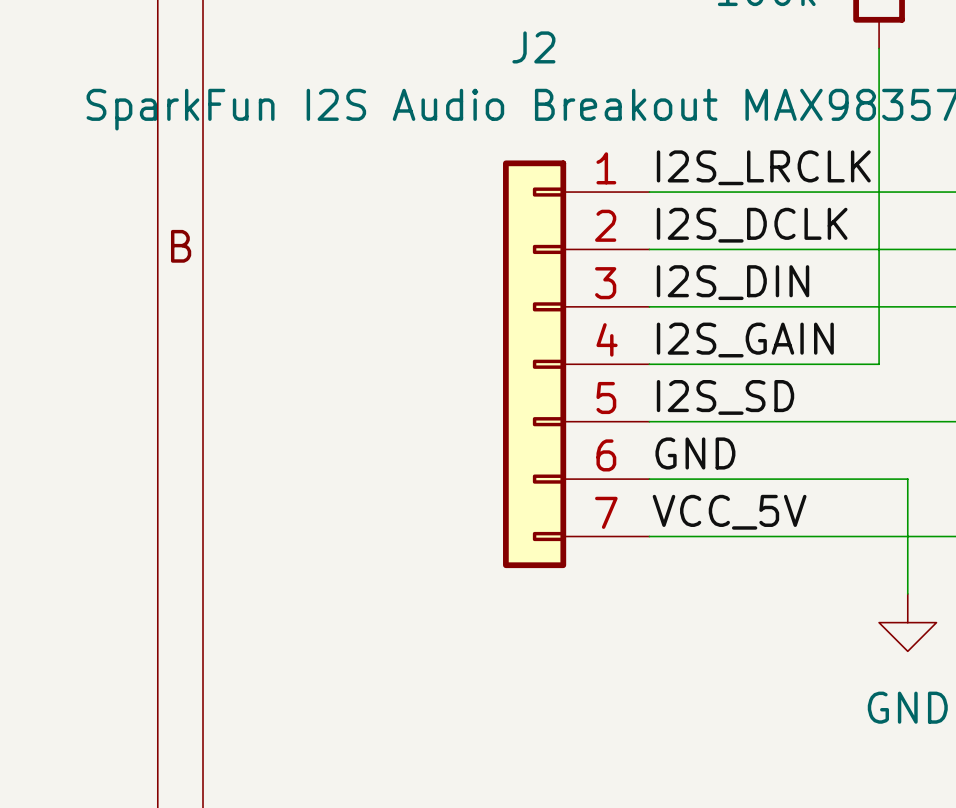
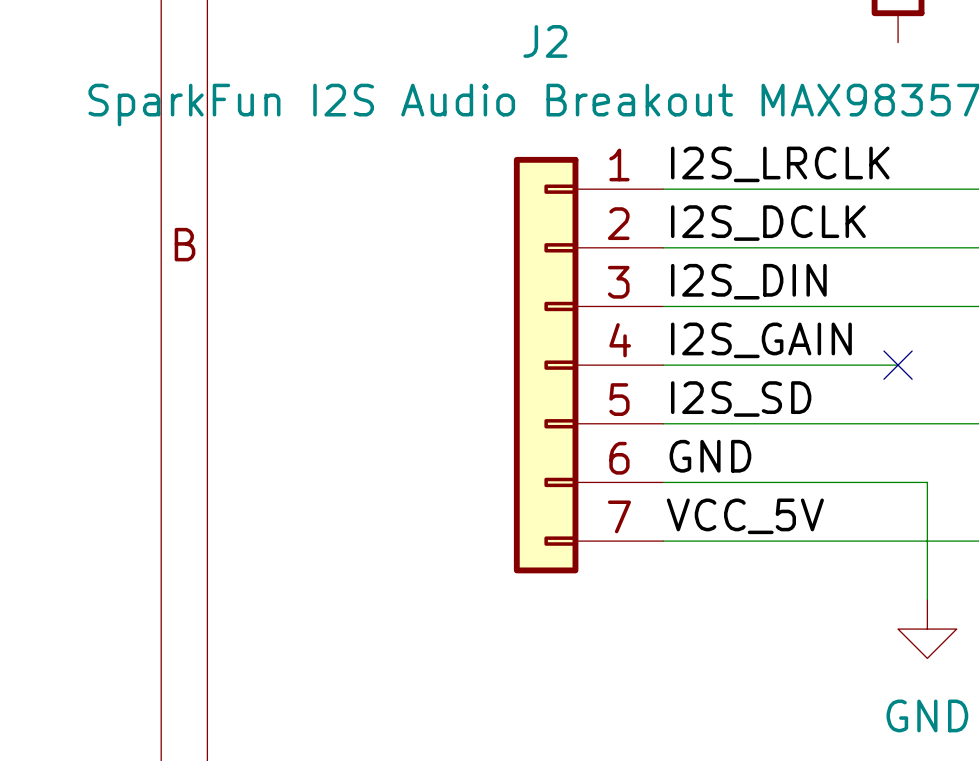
wire: (879, 48) (879, 364) -> none
no-connect mark: none -> (898, 365)

